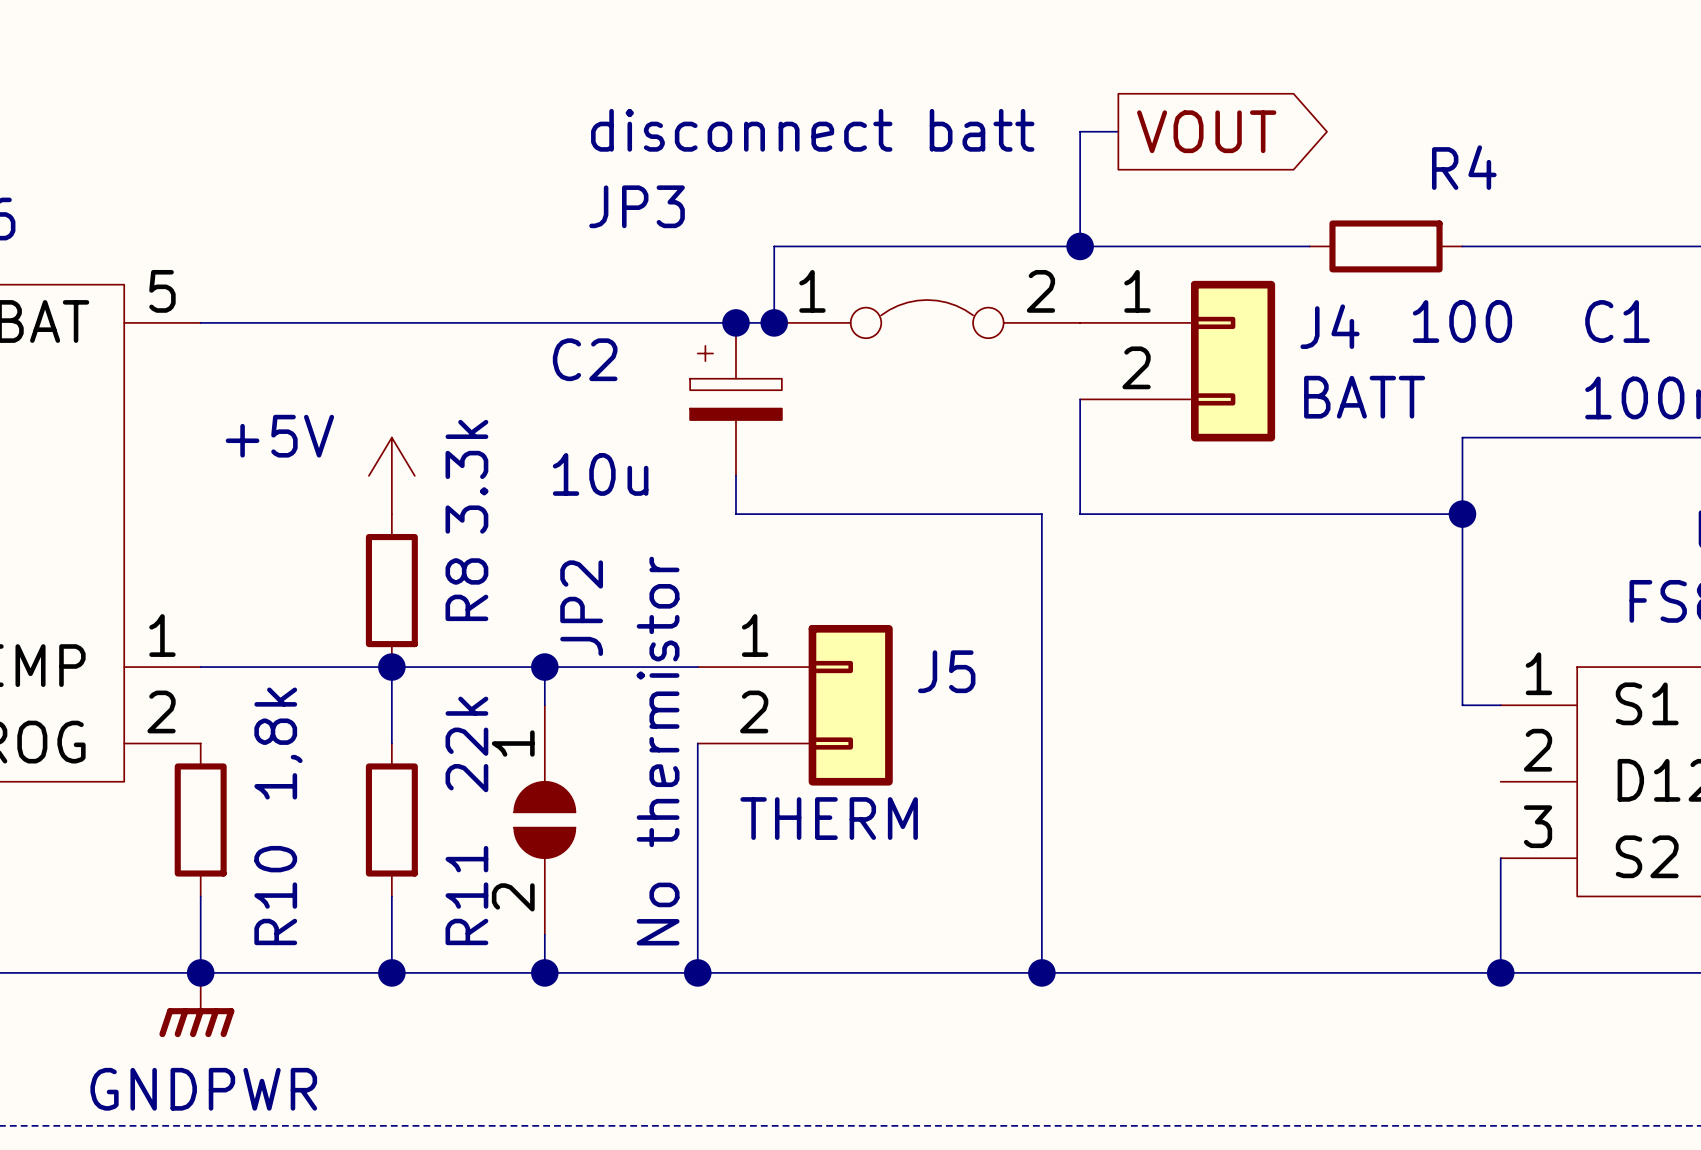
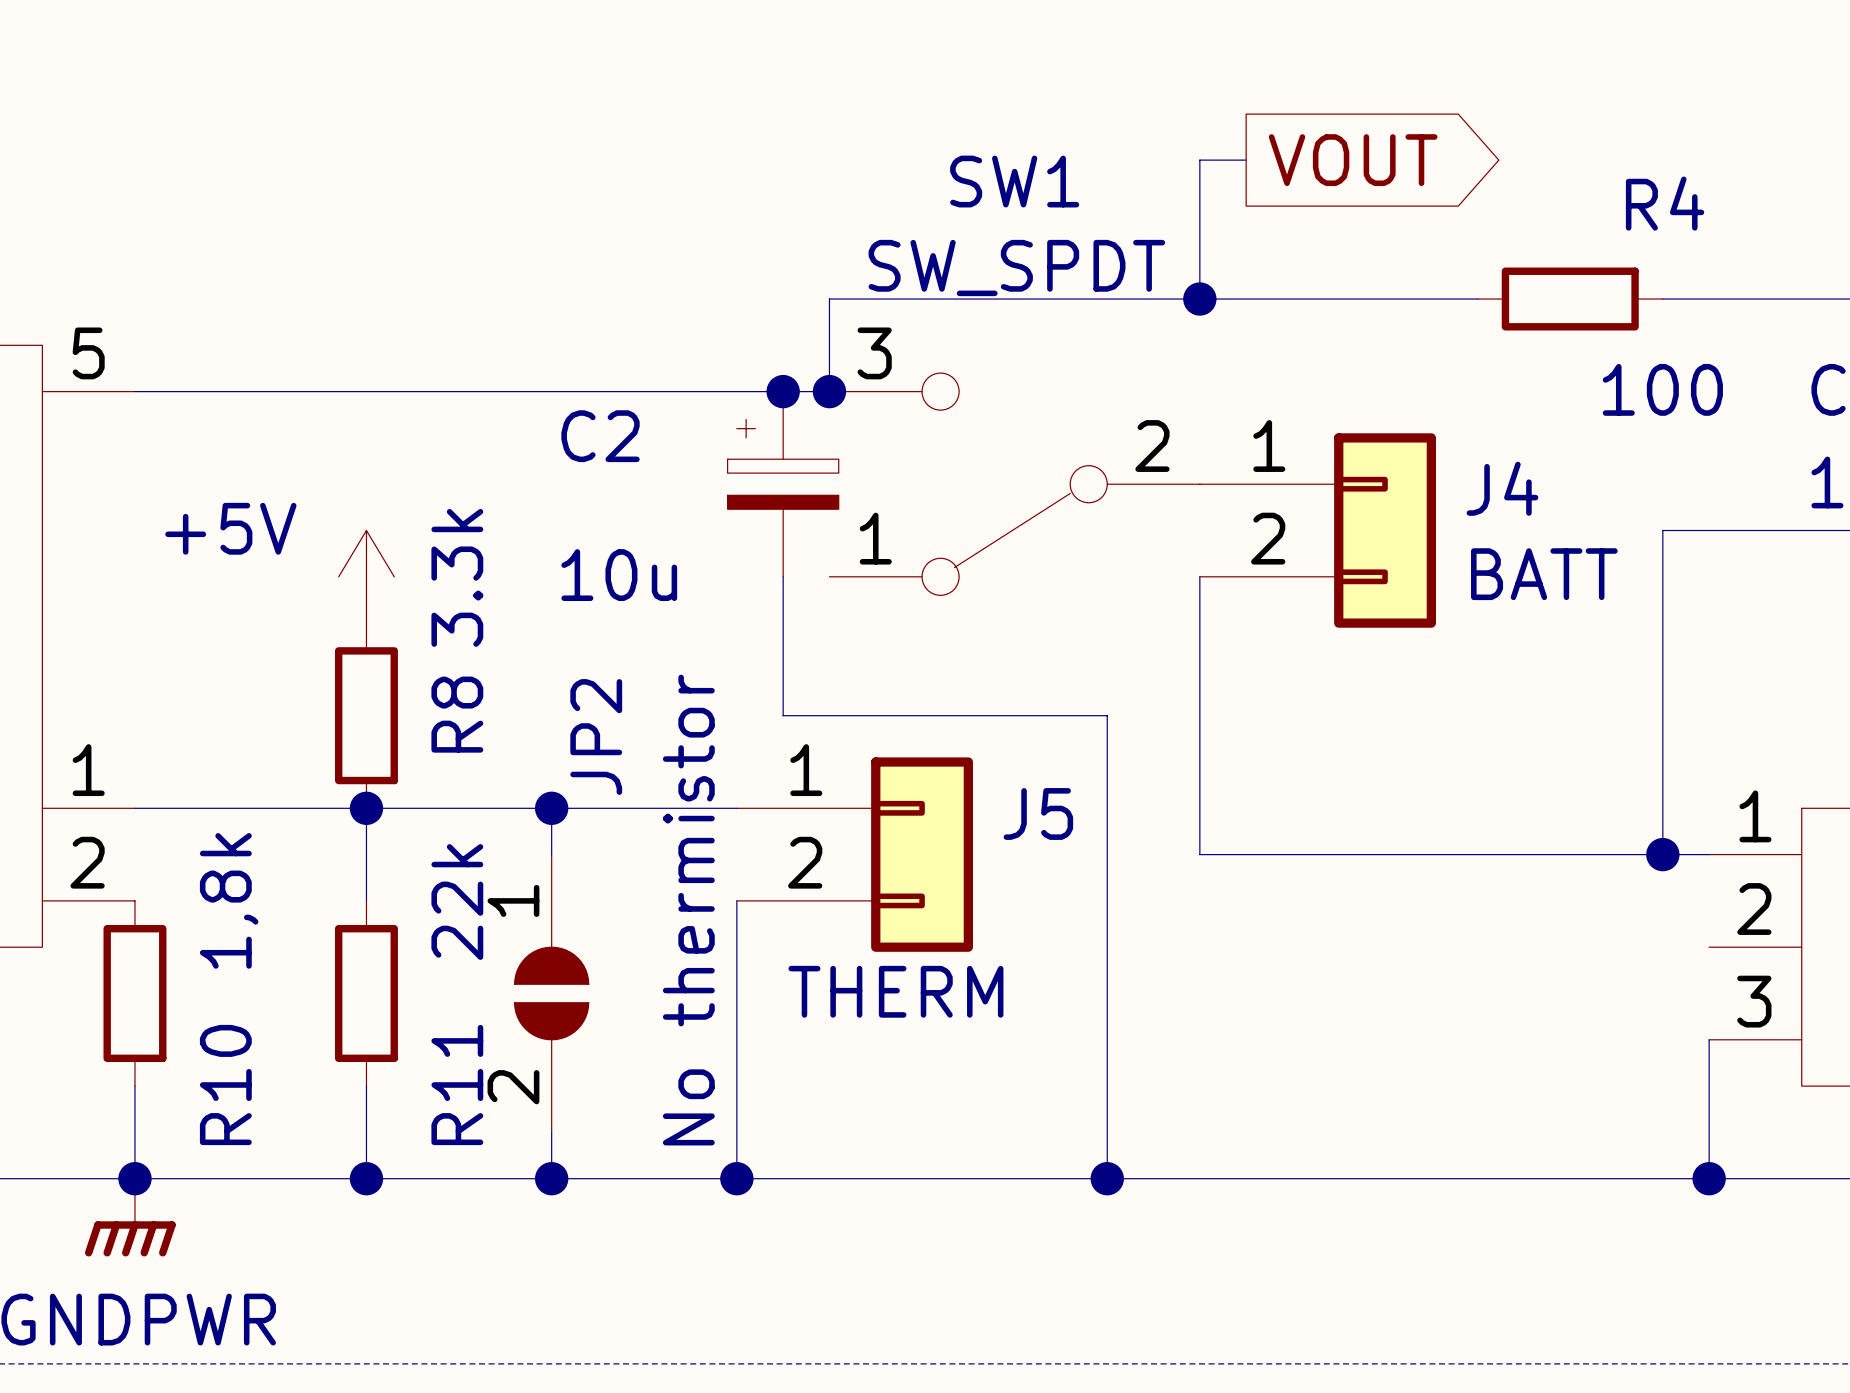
JP3: disconnect batt (927, 319) -> none
J4 position: (1177, 361) -> (1317, 530)
SW1: none -> SW_SPDT (1014, 484)
wire: (1080, 399) (1080, 475) -> none
wire: (735, 514) (1041, 514) (1041, 972) -> (783, 623) (783, 715) (1107, 715) (1107, 1178)
wire: (1080, 514) (1462, 514) -> (1199, 623) (1199, 854) (1662, 854)
junction: (1462, 514) -> none
junction: none -> (1662, 854)
junction position: (1041, 972) -> (1107, 1178)

